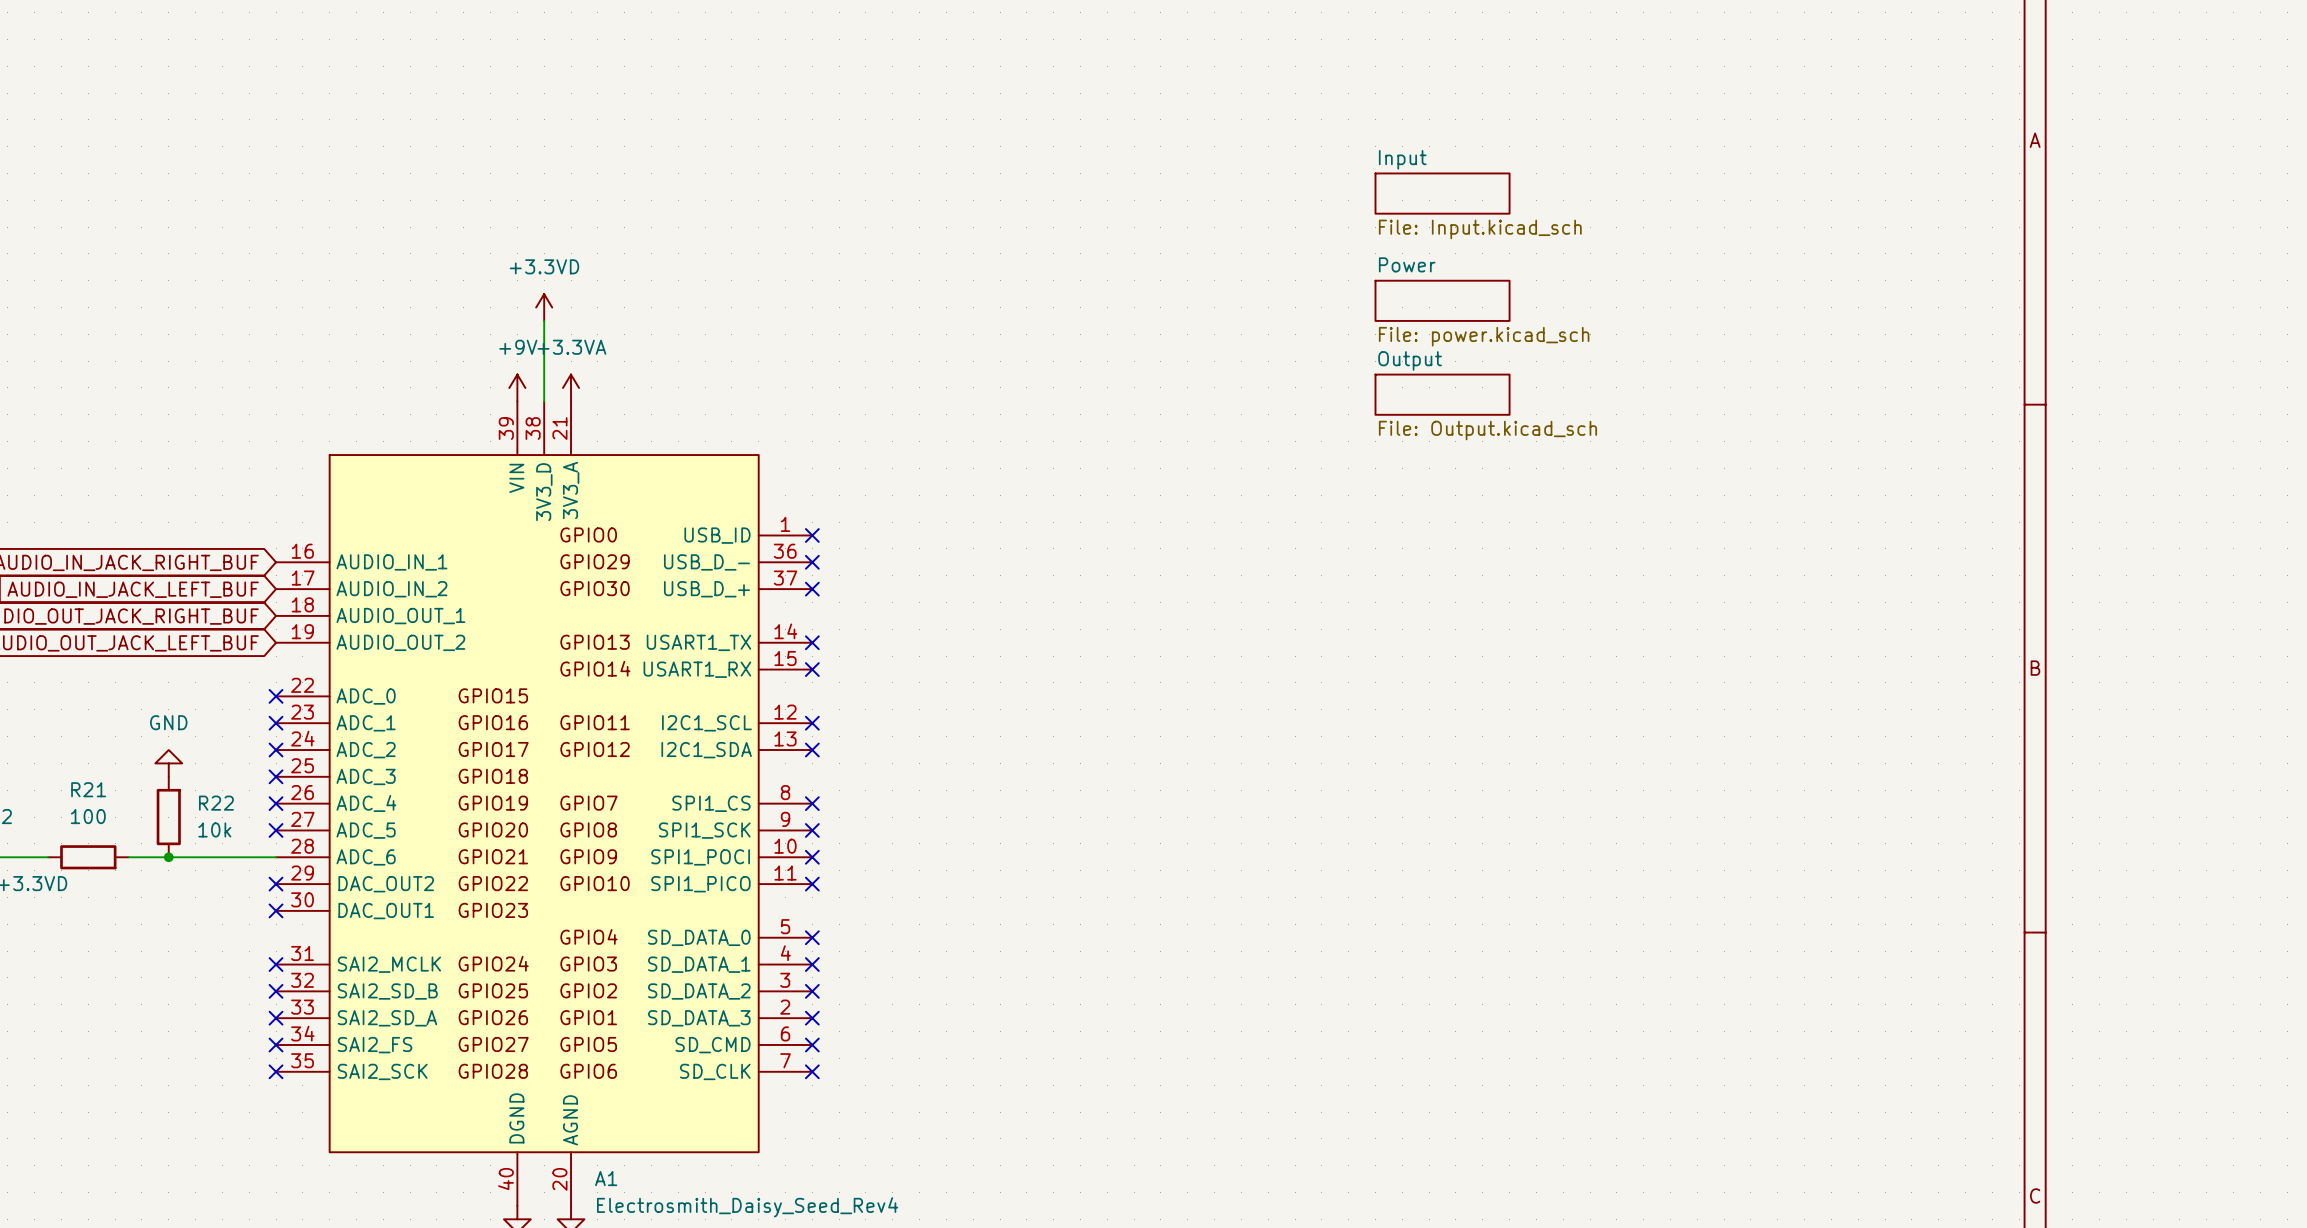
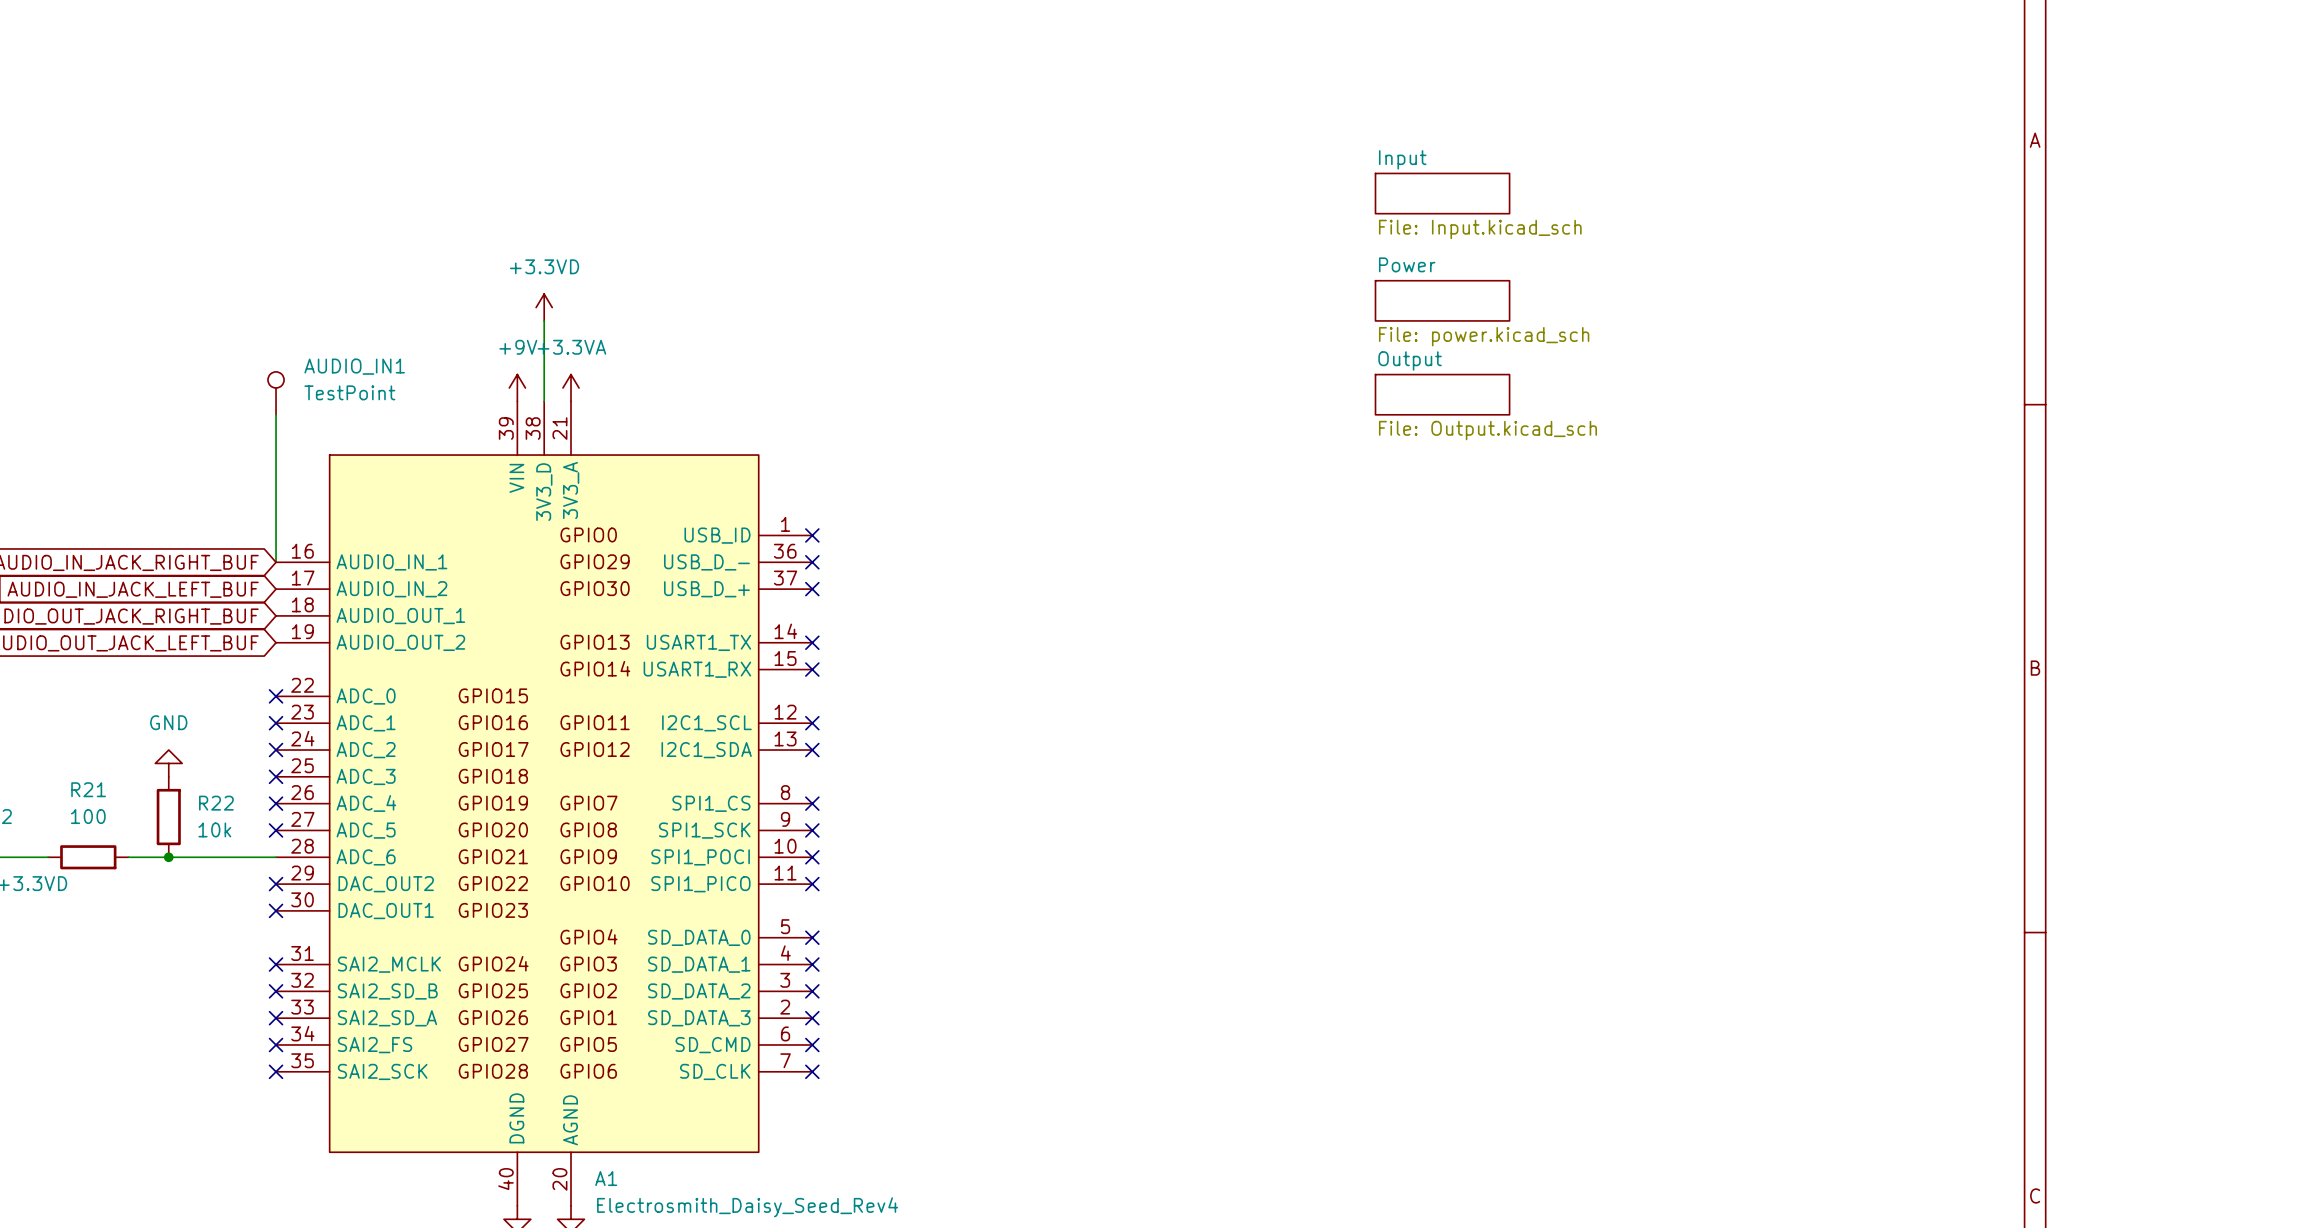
AUDIO_IN1: none -> TestPoint (276, 393)
wire: none -> (276, 414) (276, 562)

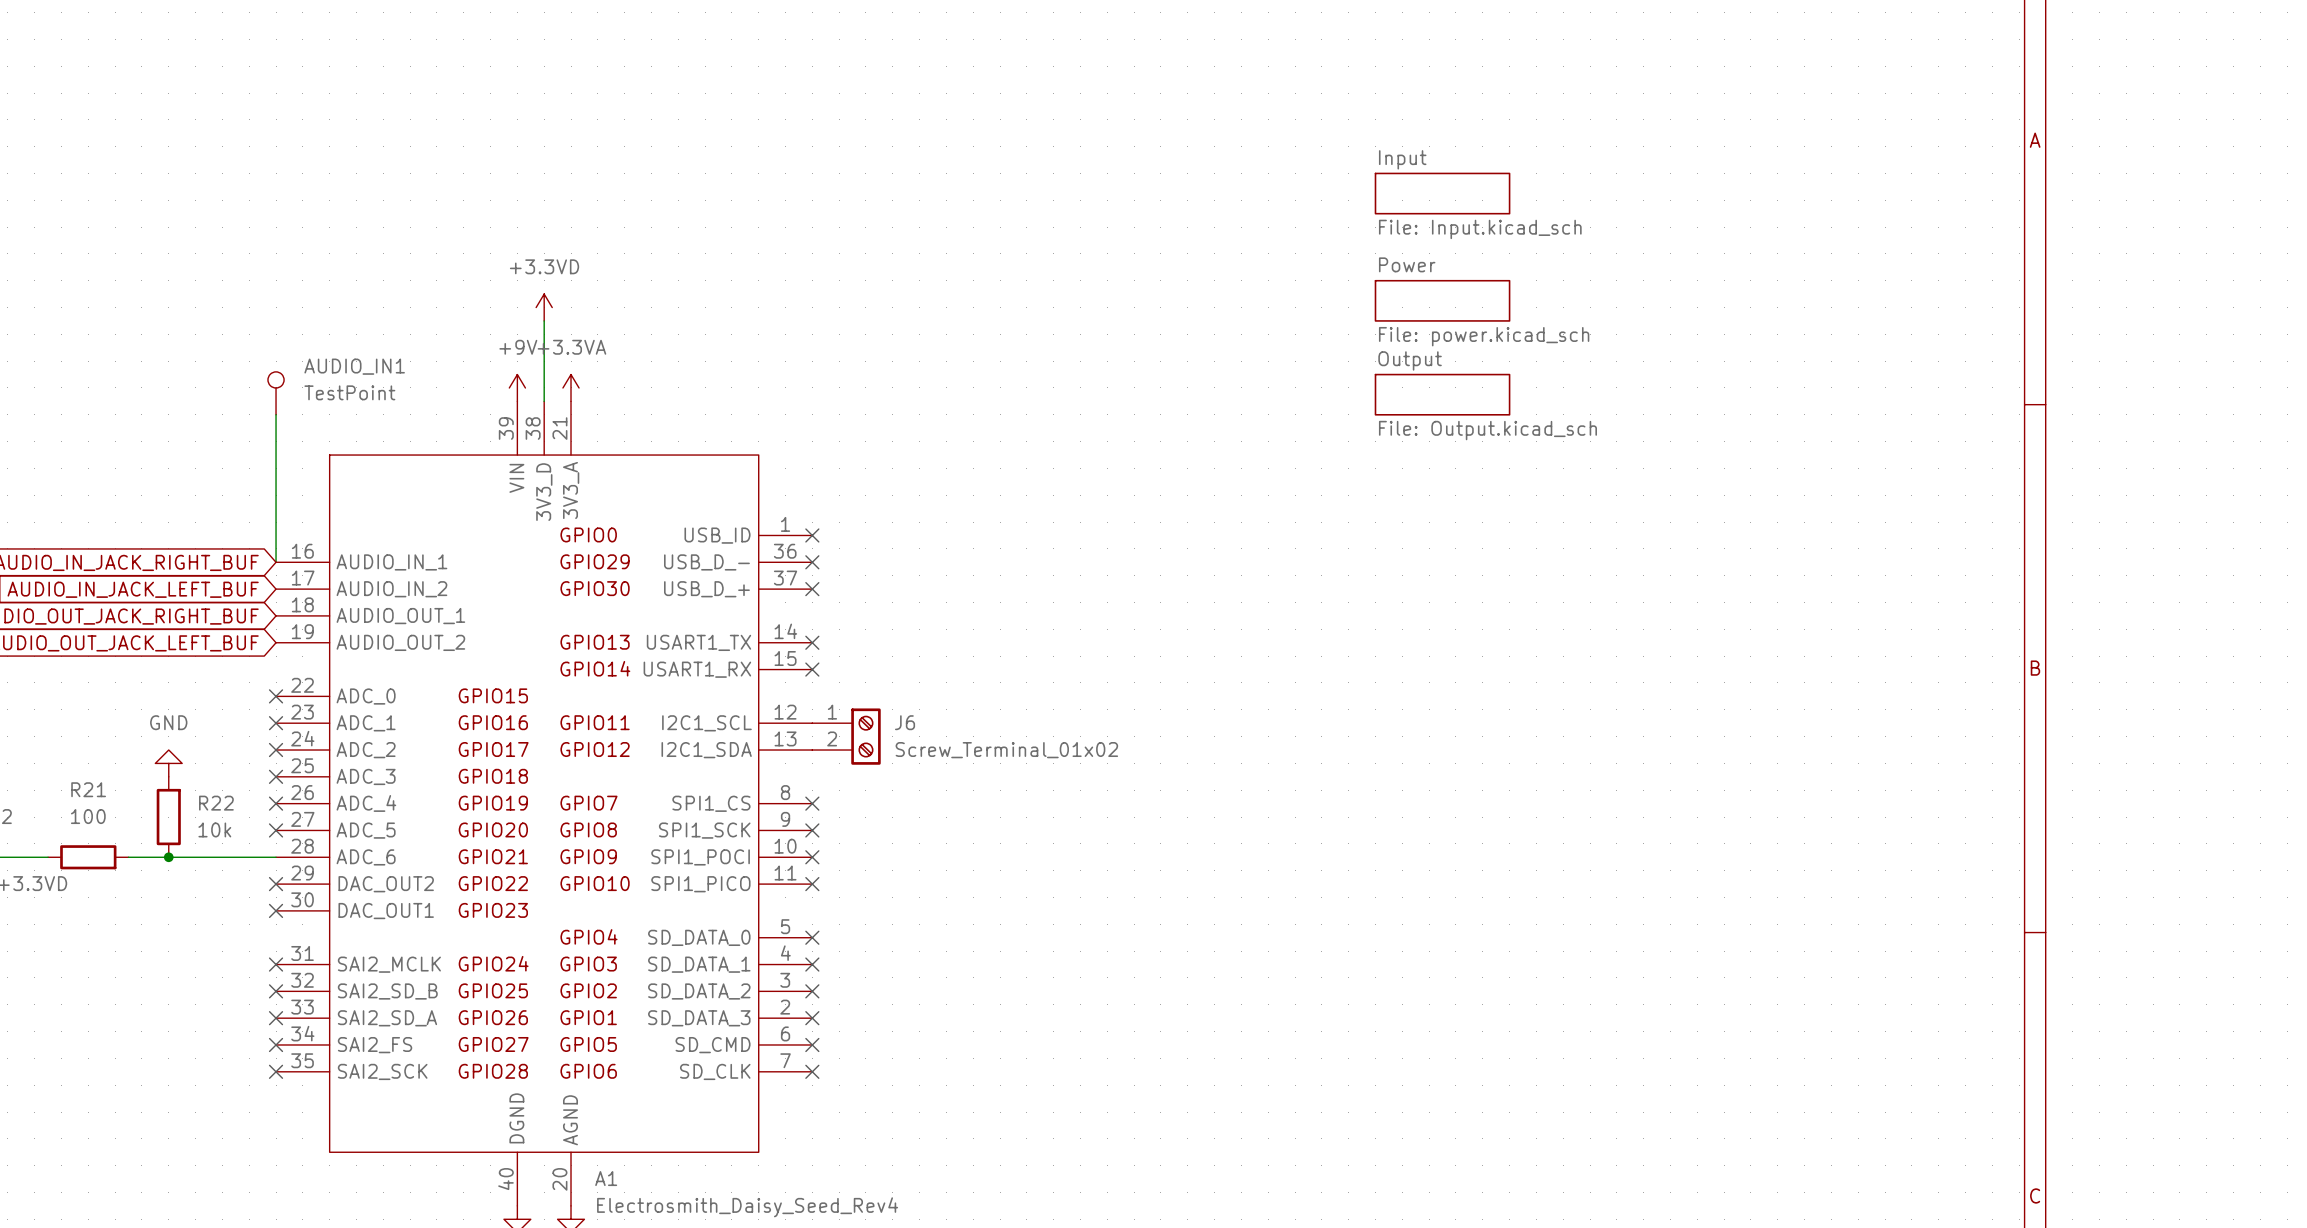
no-connect mark: (812, 723) -> none
J6: none -> Screw_Terminal_01x02 (846, 736)
no-connect mark: (812, 750) -> none

